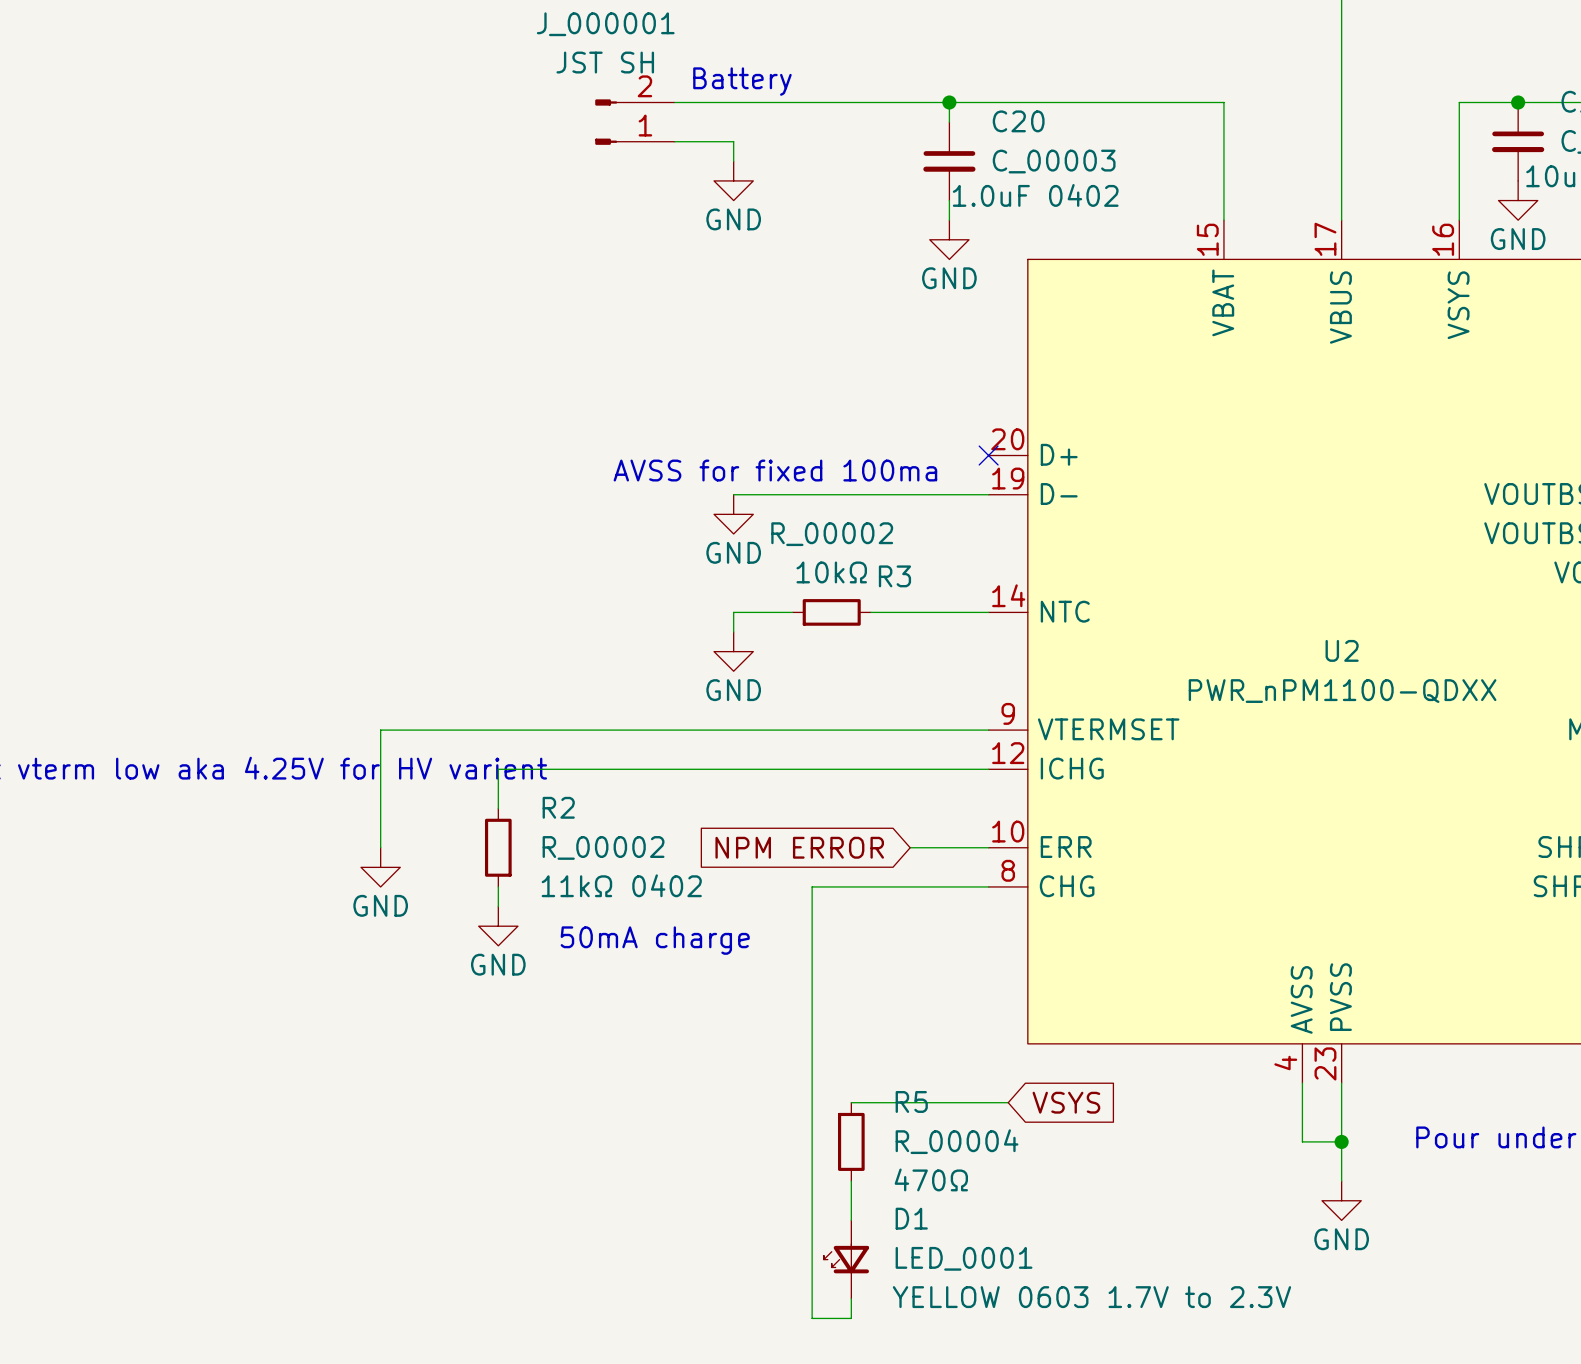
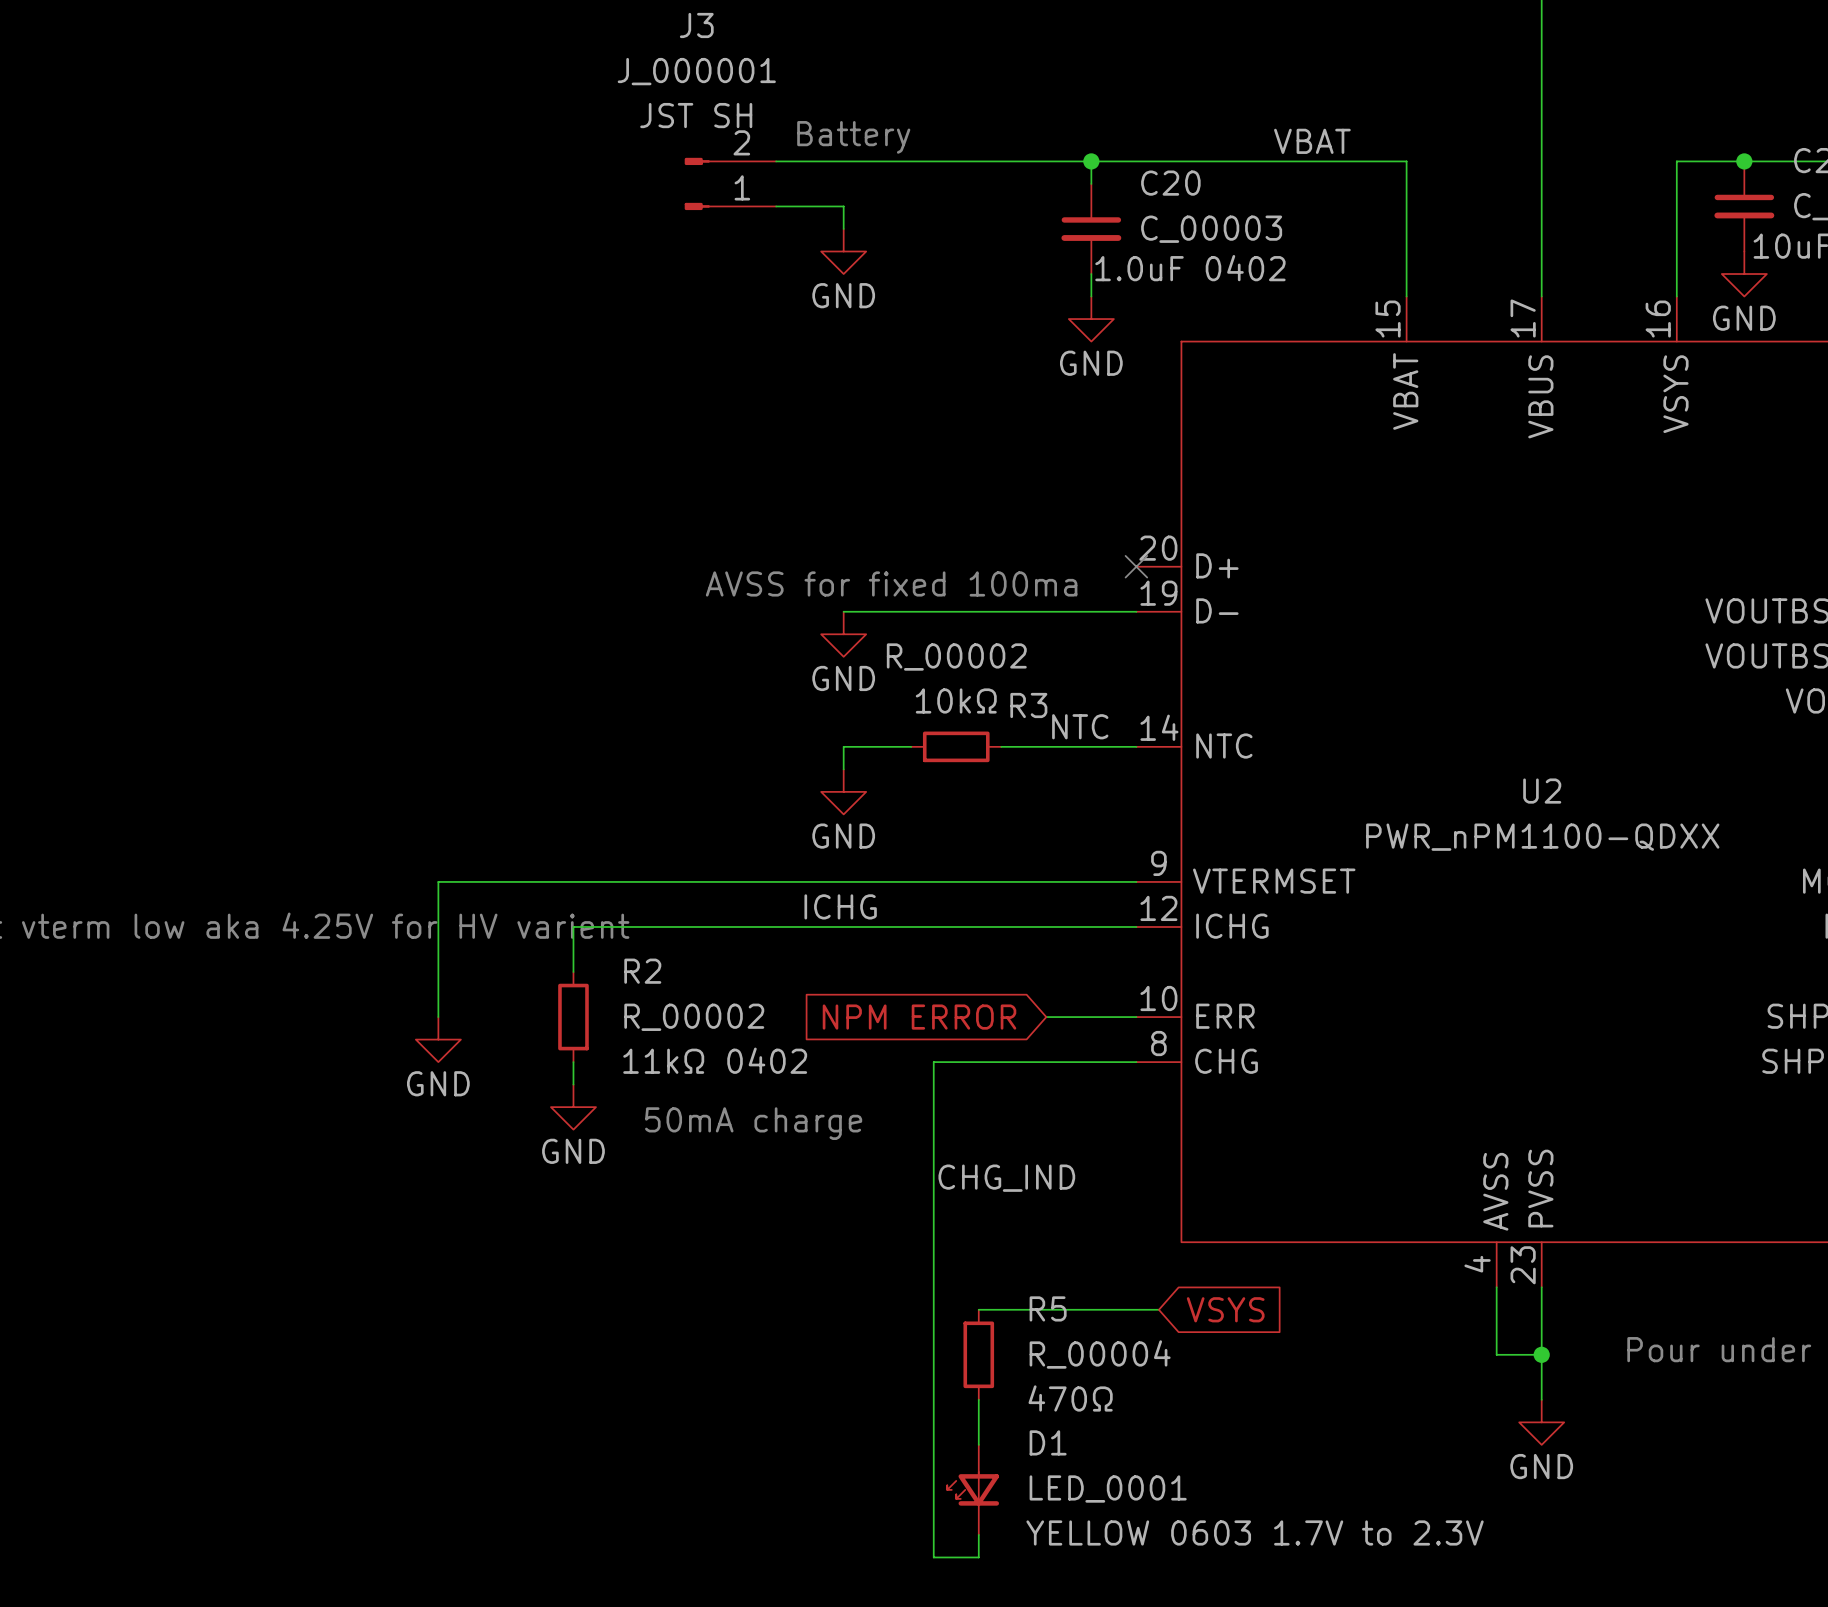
label: none -> VBAT (1312, 141)
label: none -> NTC (1080, 726)
label: none -> ICHG (840, 906)
label: none -> CHG_IND (1006, 1178)

